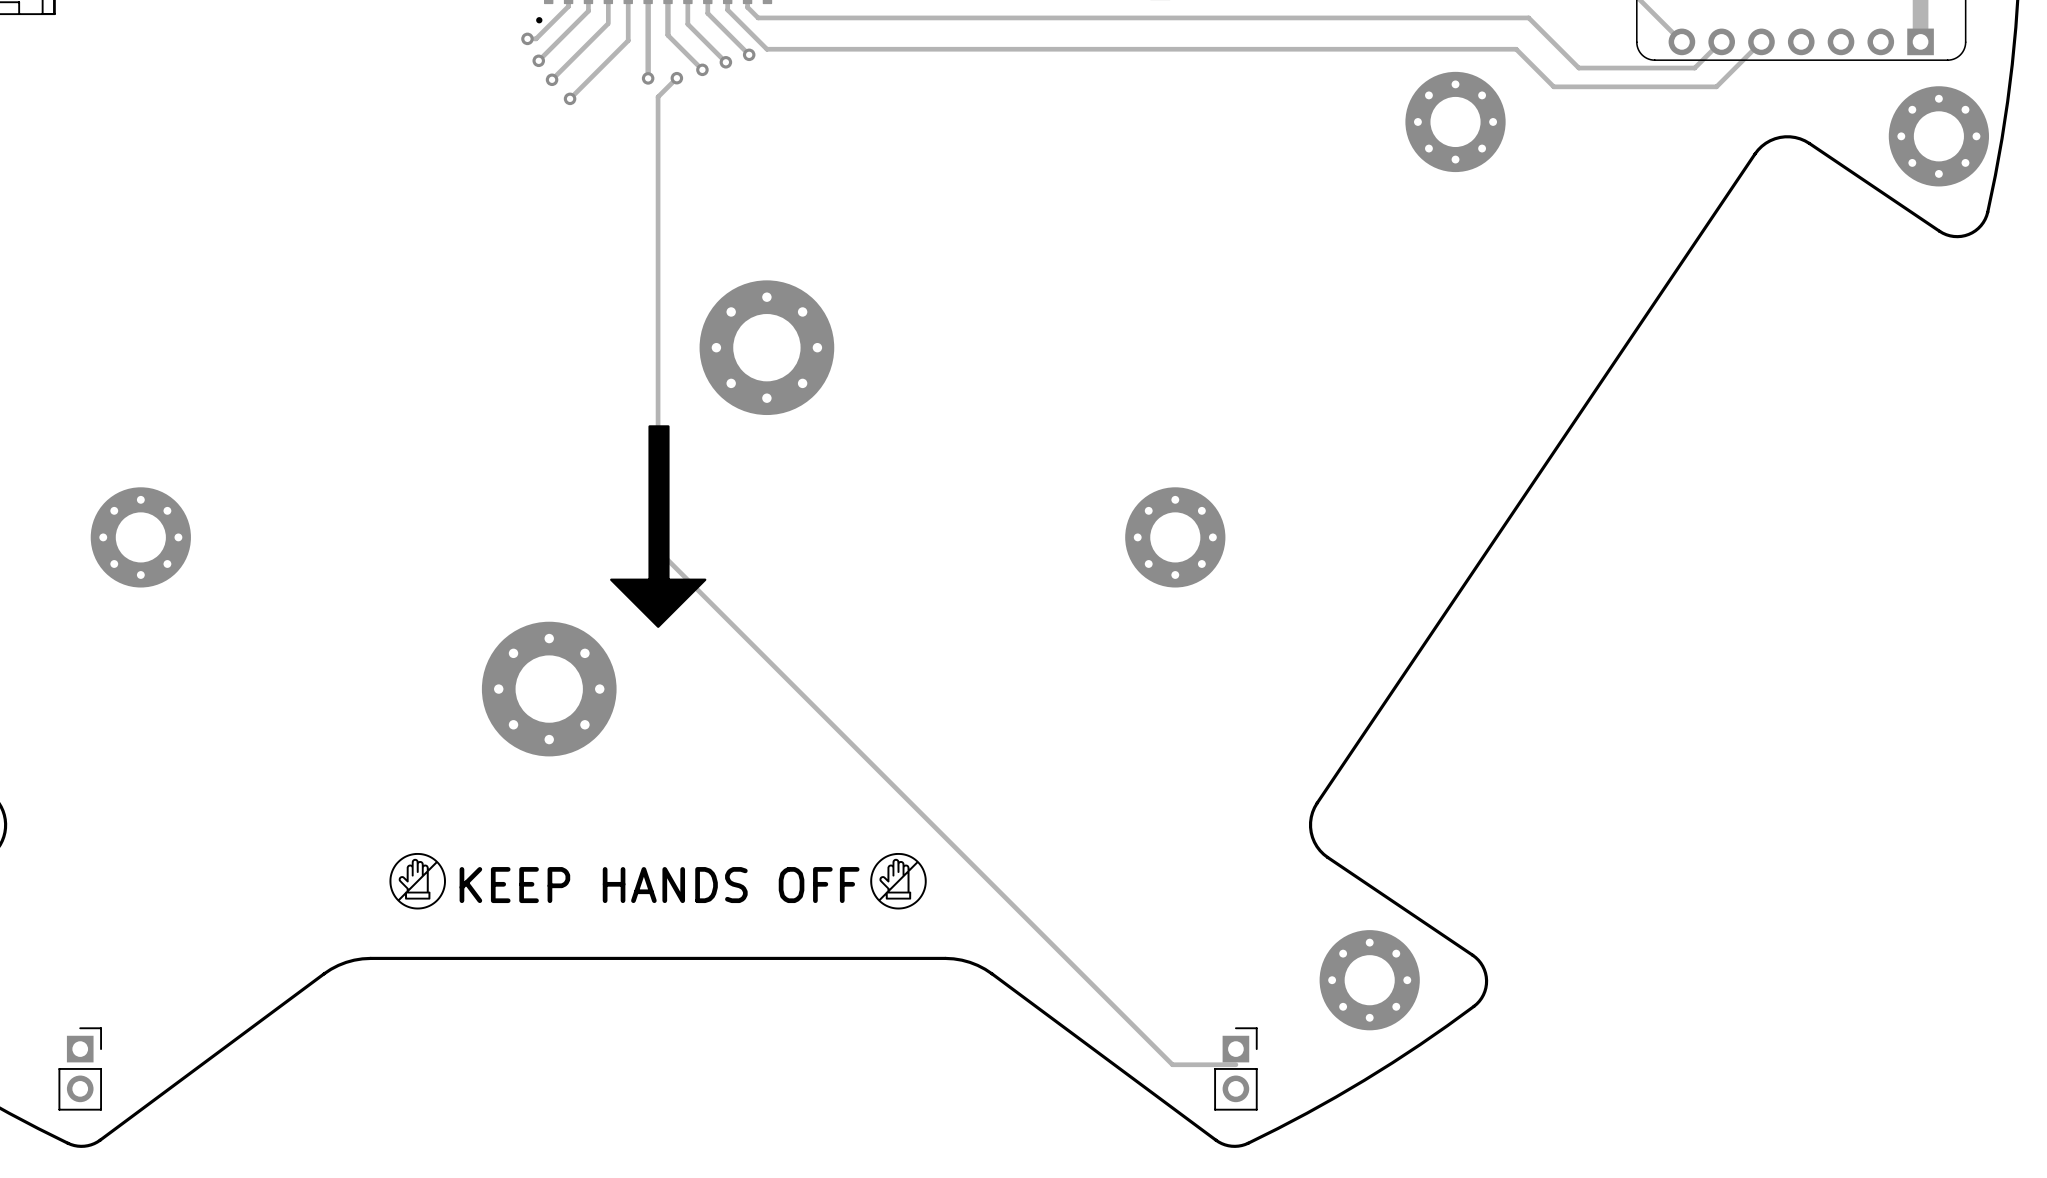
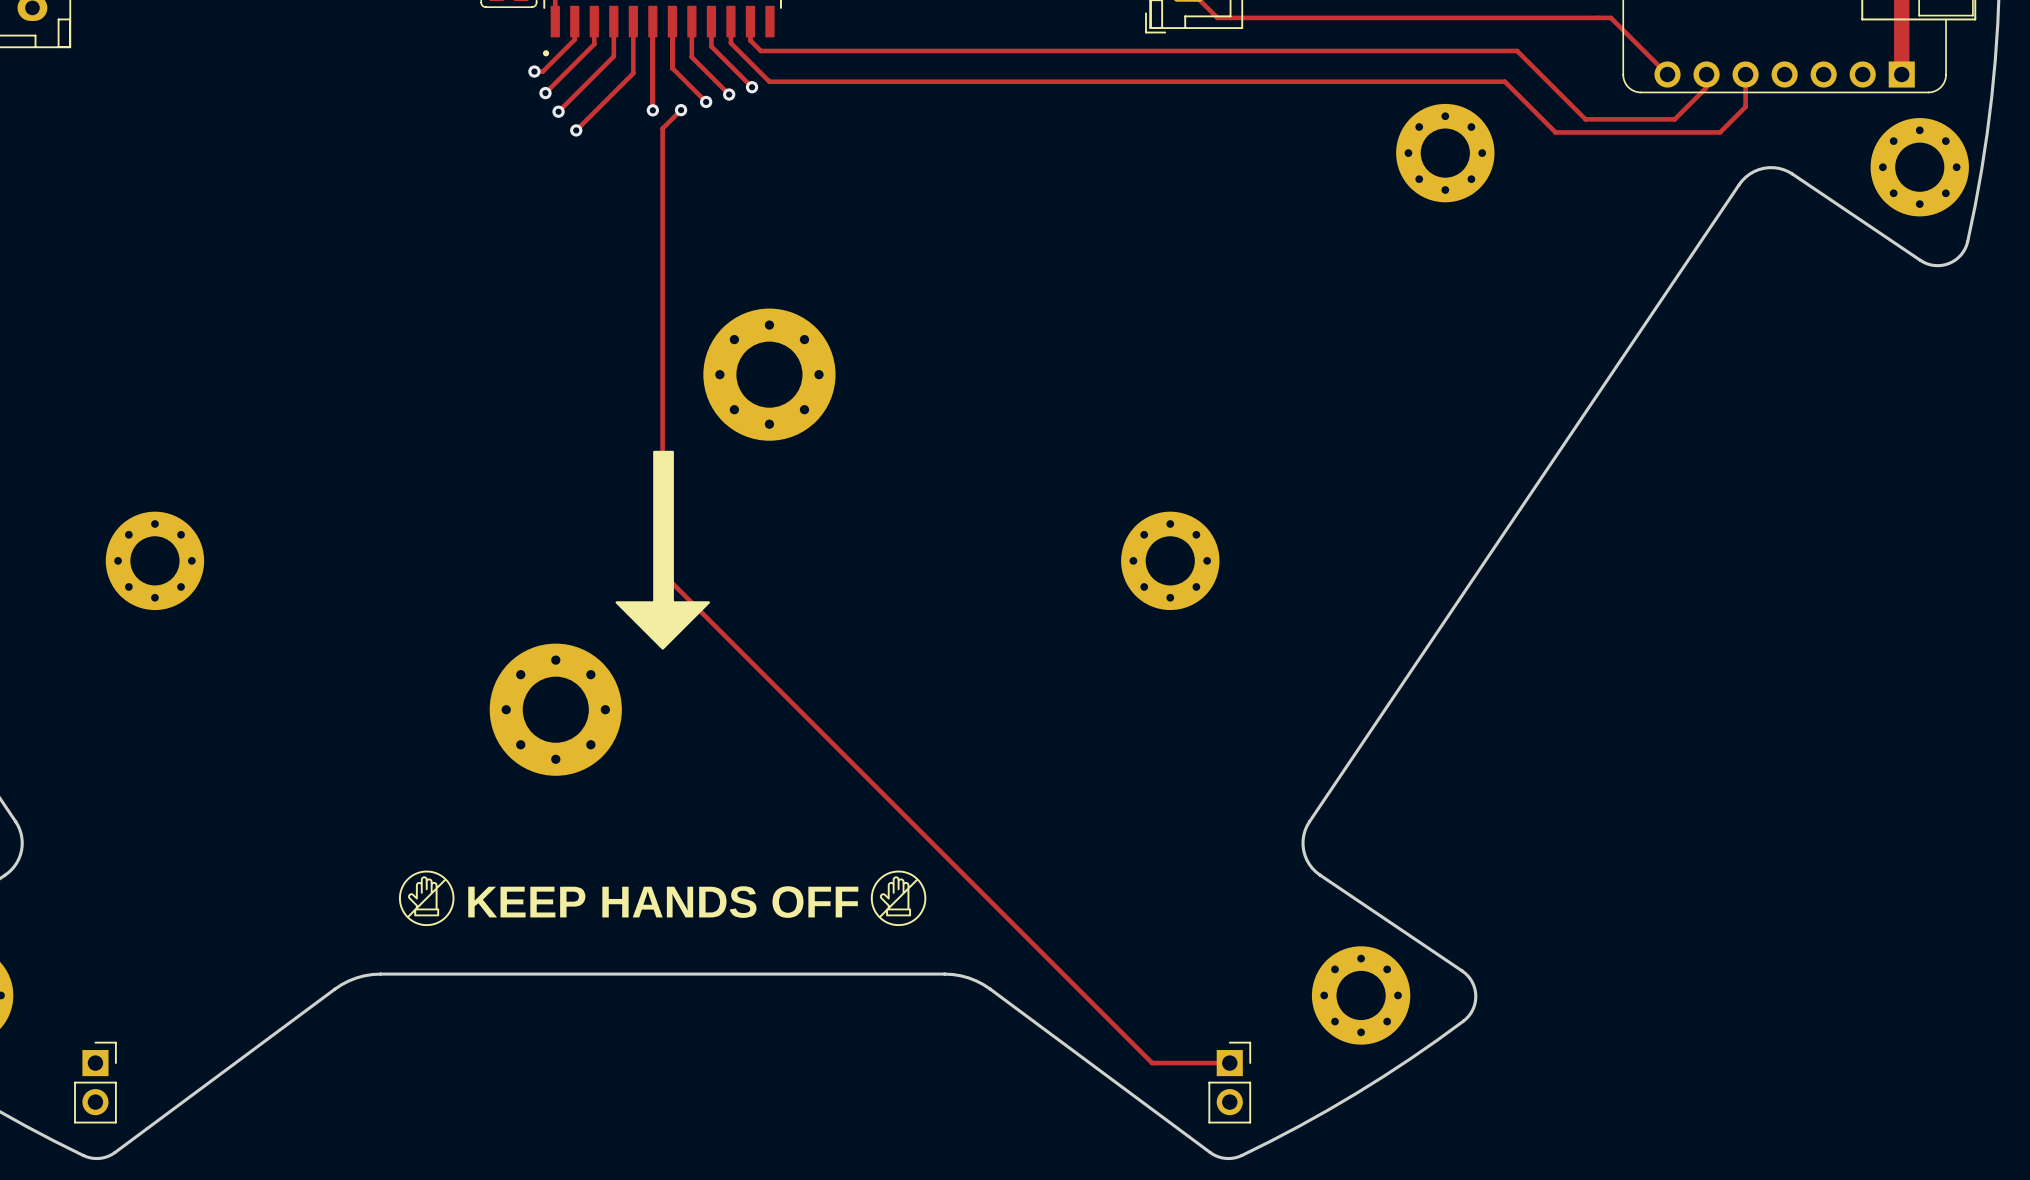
track: (1721, 41) (1694, 68) (1578, 68) -> (1706, 87) (1674, 119) (1585, 119) (1566, 100)
track: (1761, 41) (1716, 86) (1553, 86) -> (1745, 74) (1745, 106) (1720, 132) (1555, 132) (1541, 118)
track: (1156, 1049) (1172, 1064) (1235, 1064) -> (1152, 1063) (1229, 1063)

